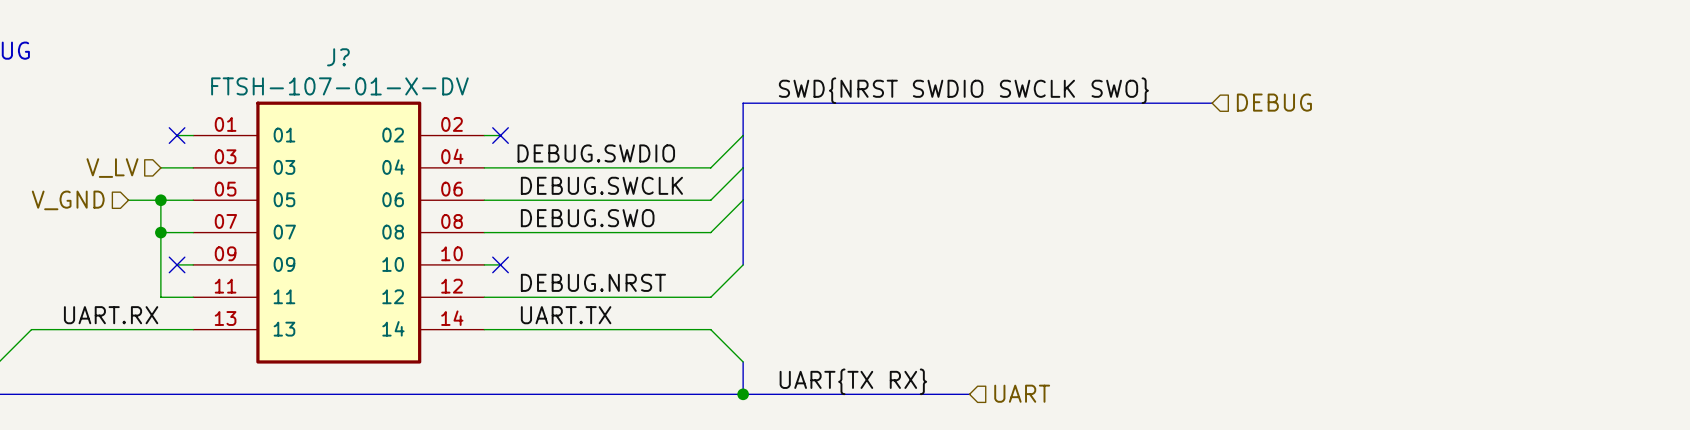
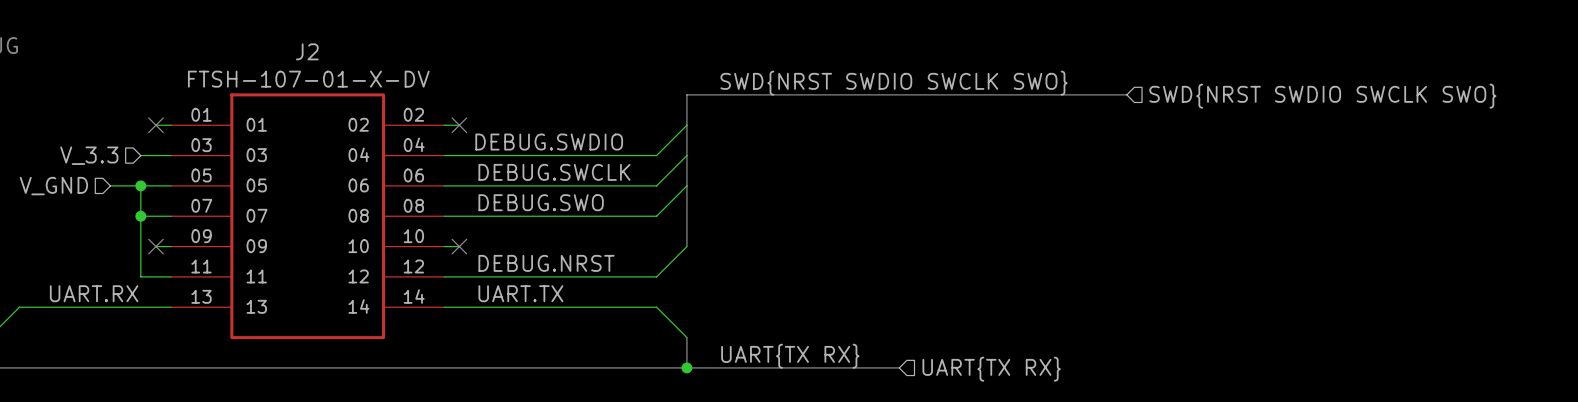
J? name: J? (338, 57) -> J2 (307, 51)
hierarchical label: DEBUG (1274, 102) -> SWD{NRST SWDIO SWCLK SWO} (1322, 96)
hierarchical label: V_LV (112, 168) -> V_3.3 (89, 155)
hierarchical label: UART (1022, 393) -> UART{TX RX} (991, 369)

